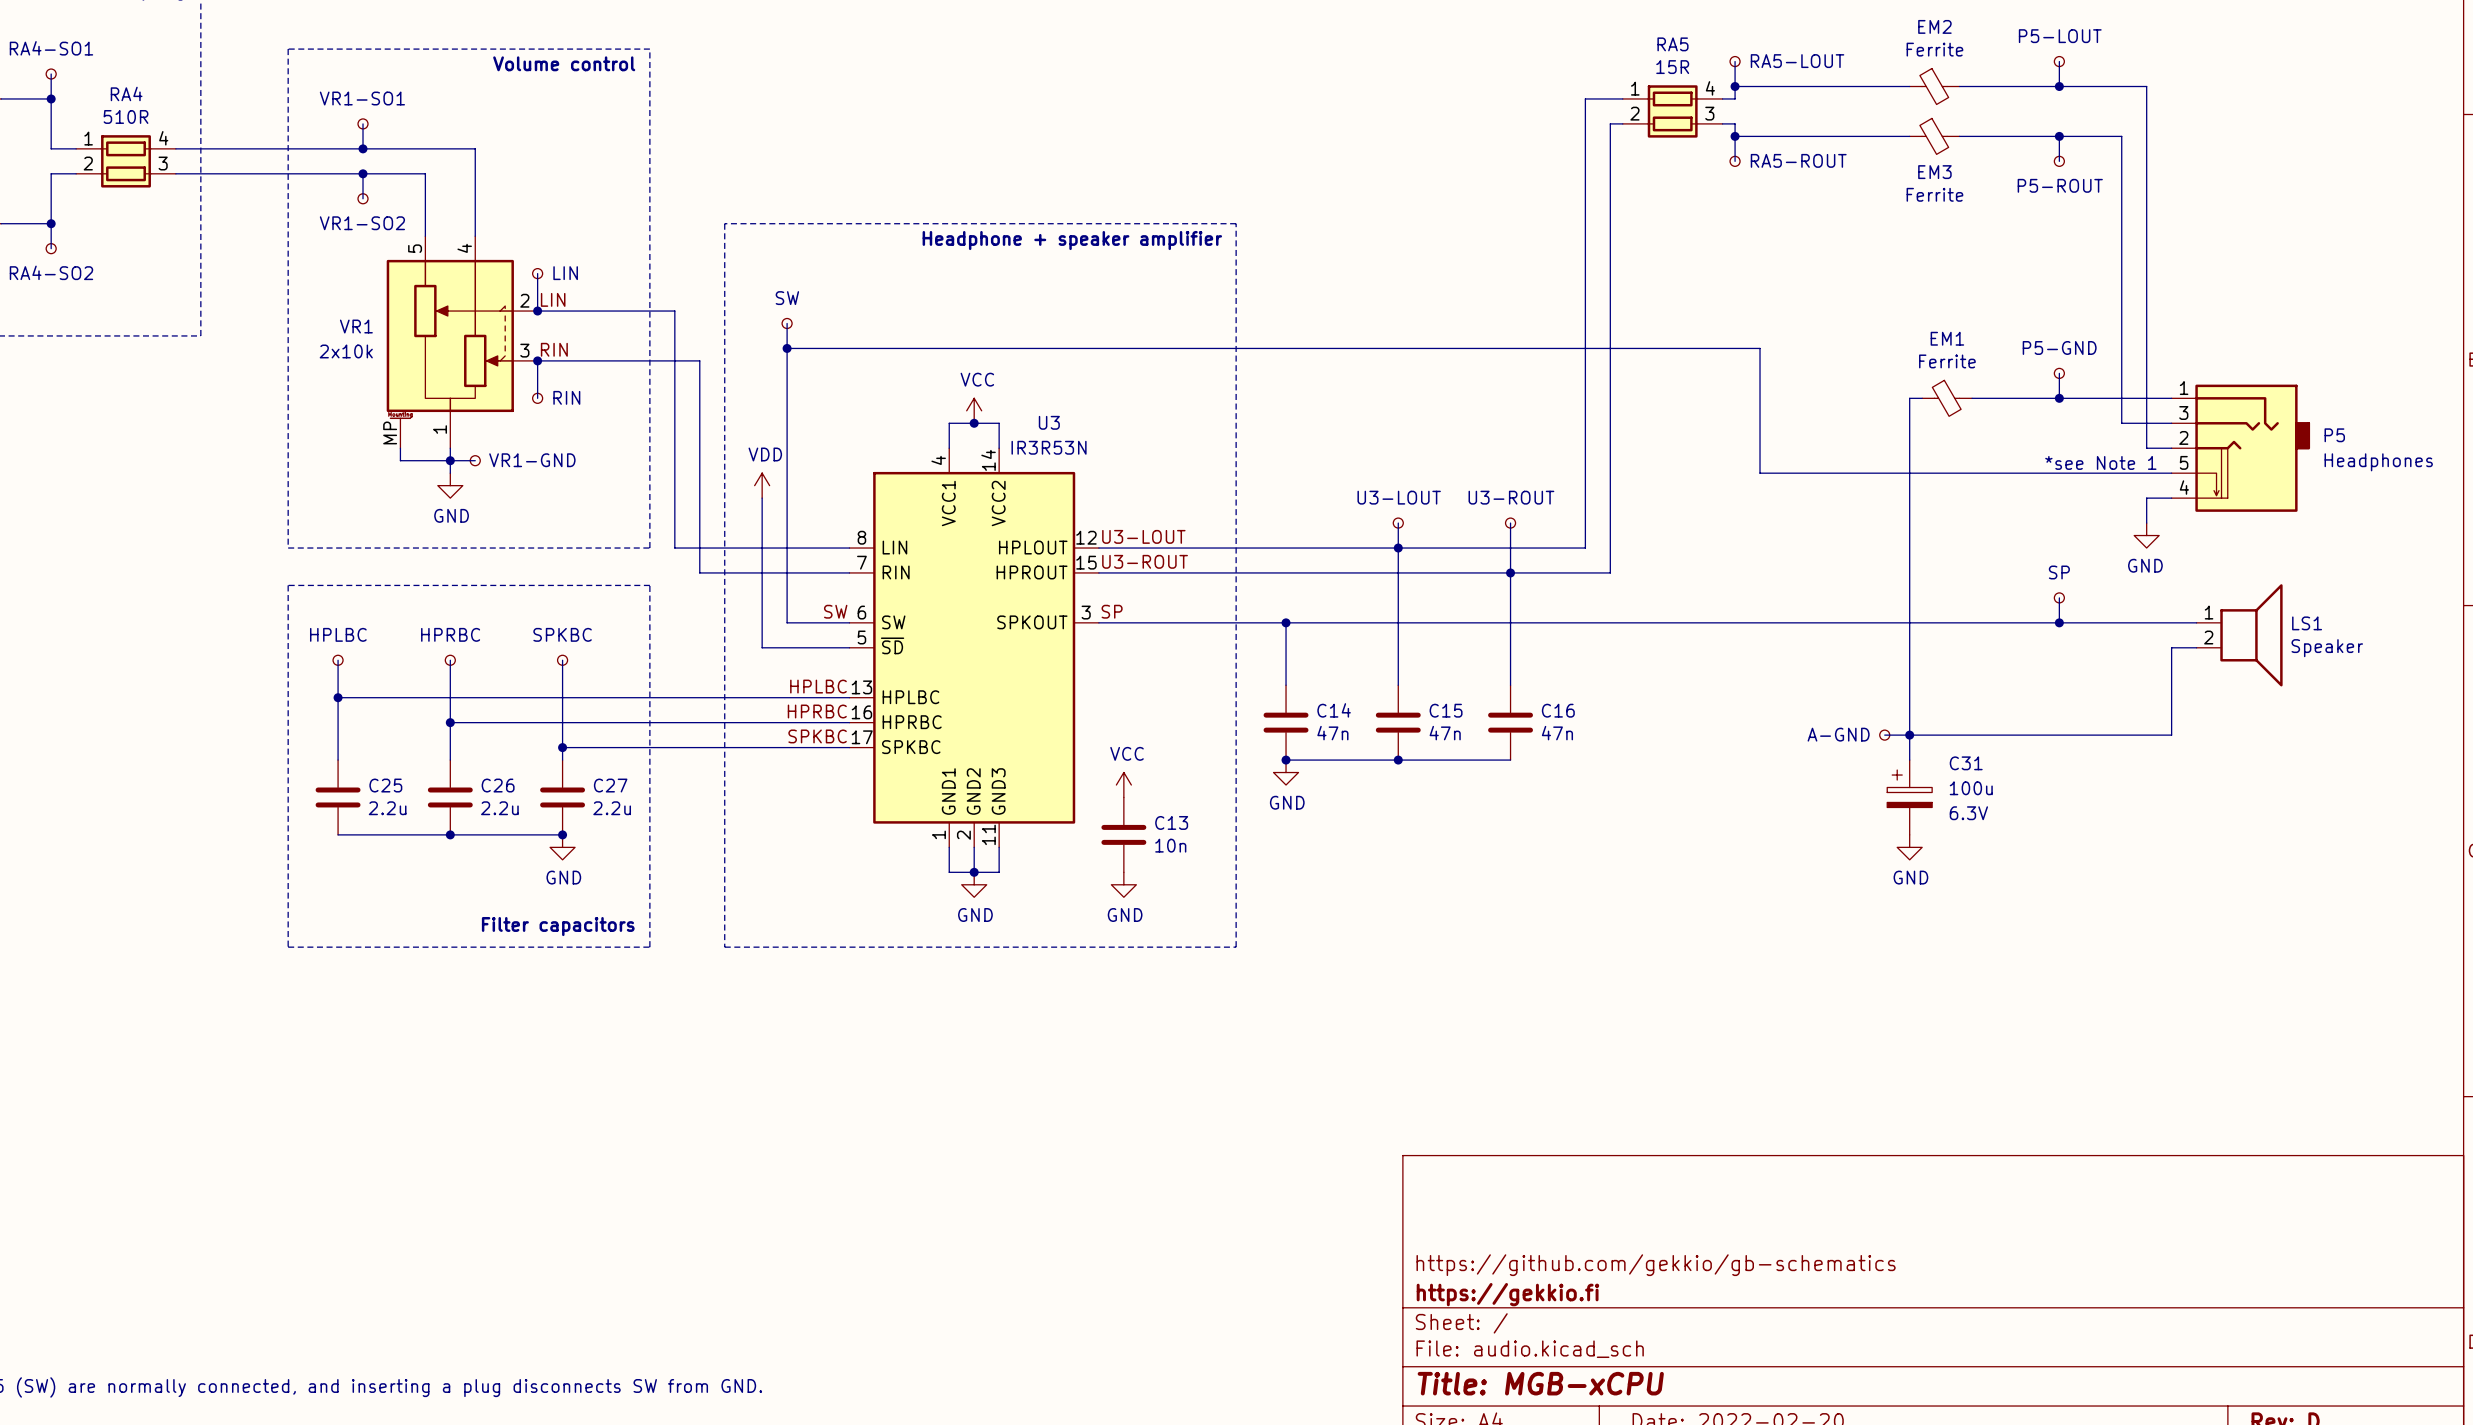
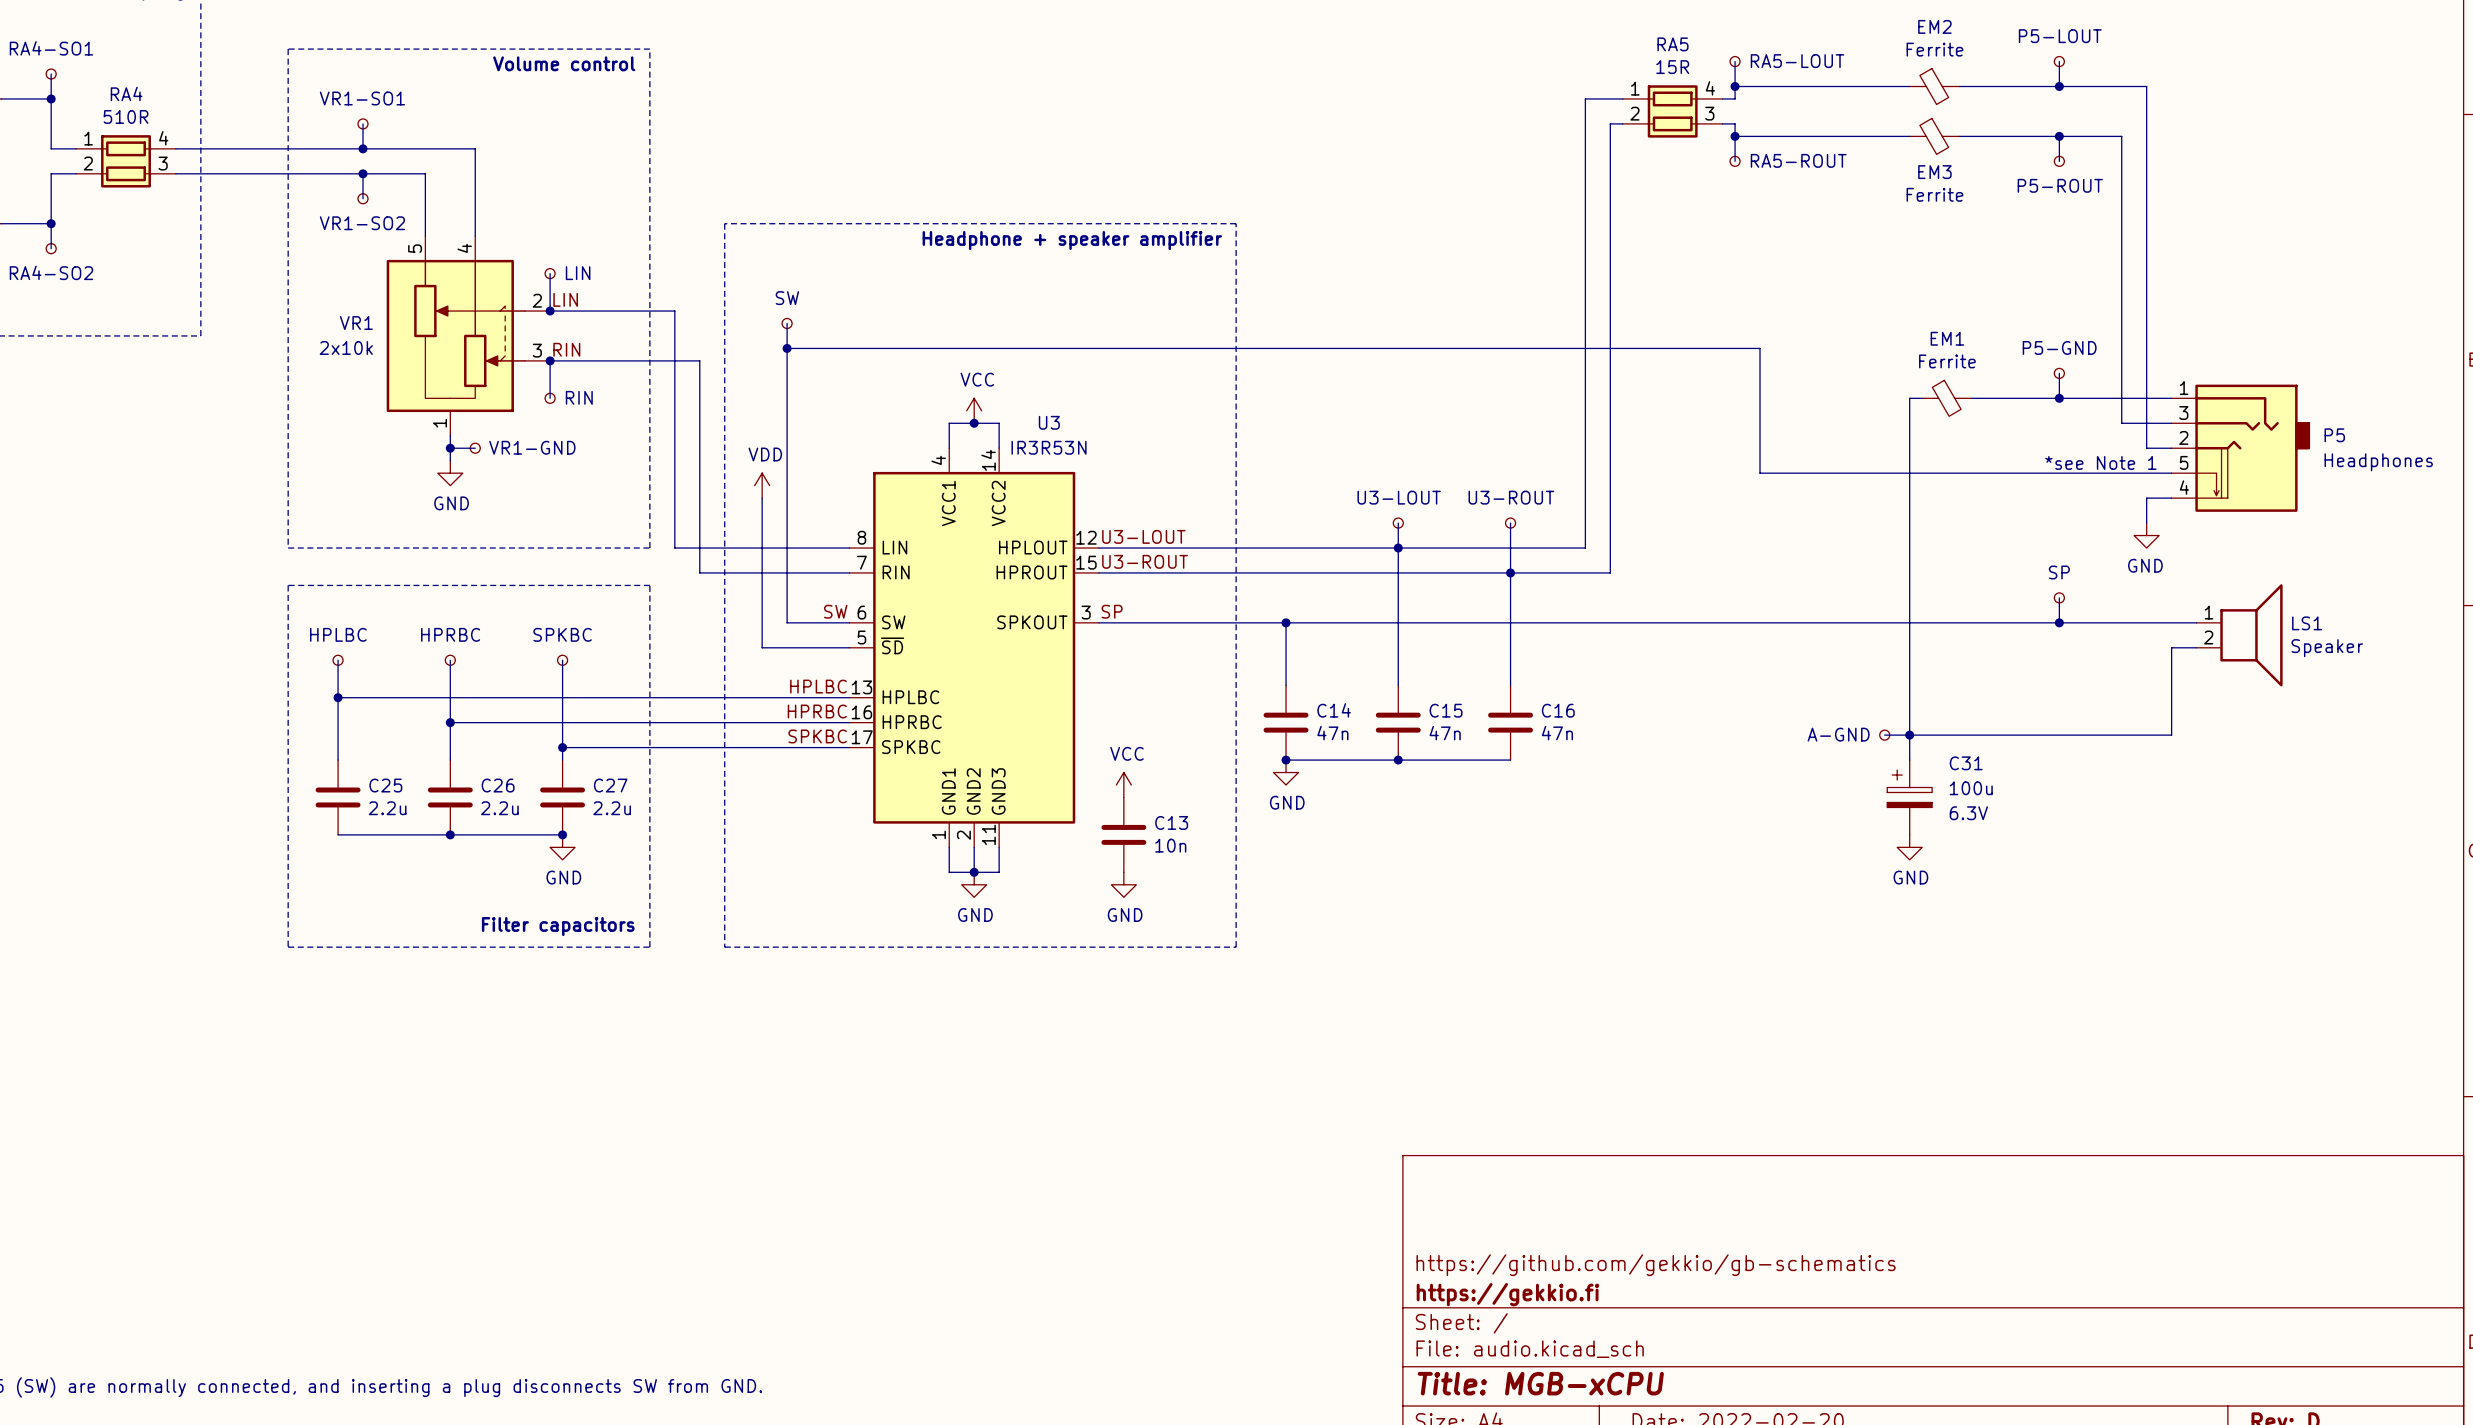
VR1 symbol: [386, 236, 538, 449] -> [386, 236, 551, 436]
wire: (537, 273) (537, 311) (550, 311) -> (550, 273) (550, 311)
part position: (537, 273) -> (550, 273)
label position: LIN (553, 299) -> LIN (565, 299)
junction position: (537, 311) -> (550, 311)
label position: RIN (554, 349) -> RIN (566, 349)
junction position: (537, 360) -> (550, 360)
wire: (550, 360) (537, 360) (537, 398) -> (550, 360) (550, 398)
part position: (537, 398) -> (550, 398)
wire: none -> (450, 435) (450, 448) (475, 448)
wire: (400, 448) (400, 460) (475, 460) -> none
junction position: (450, 460) -> (450, 448)
part position: (475, 460) -> (475, 448)
power symbol position: GND (450, 485) -> GND (450, 473)

